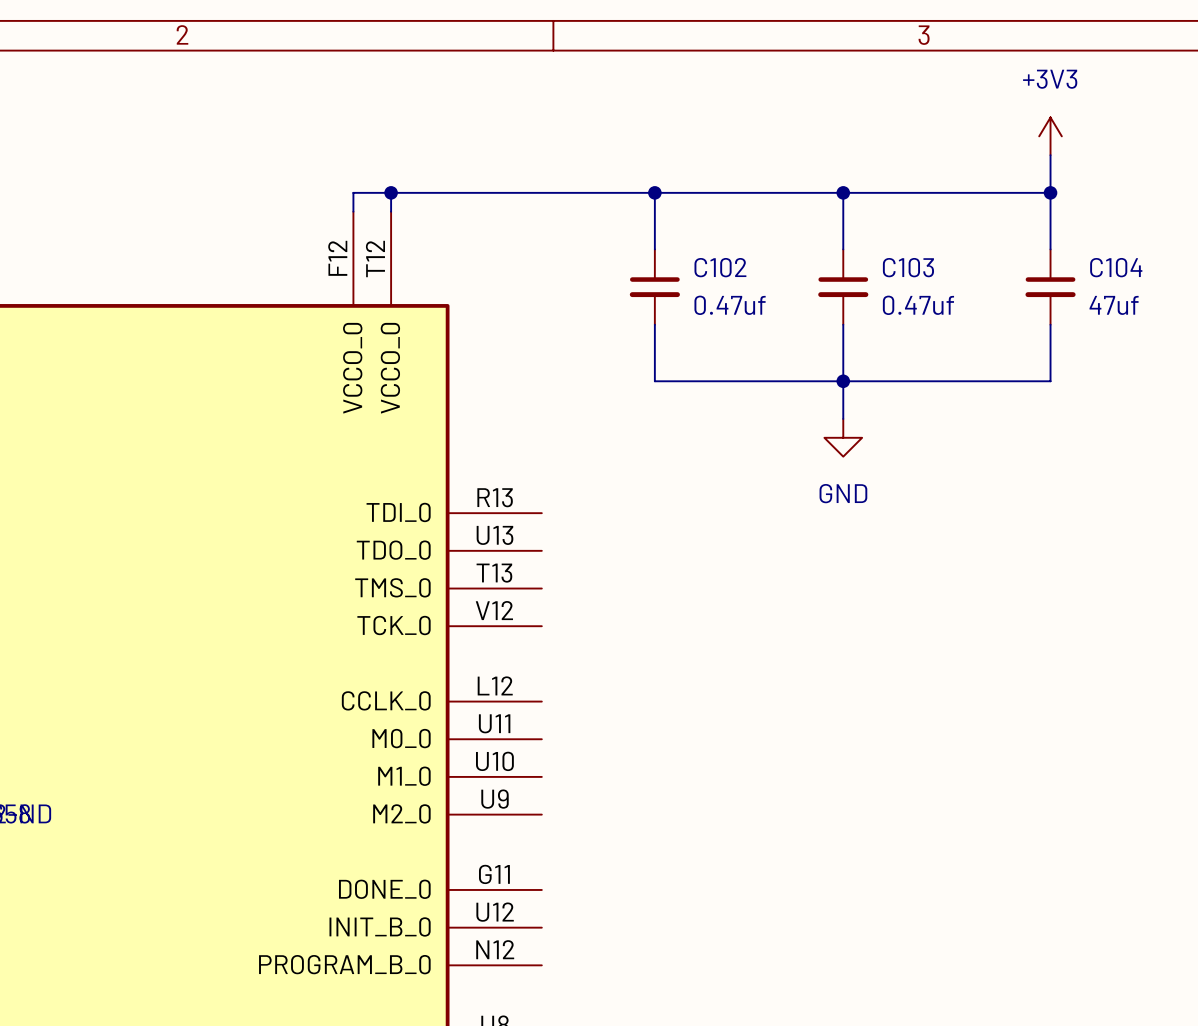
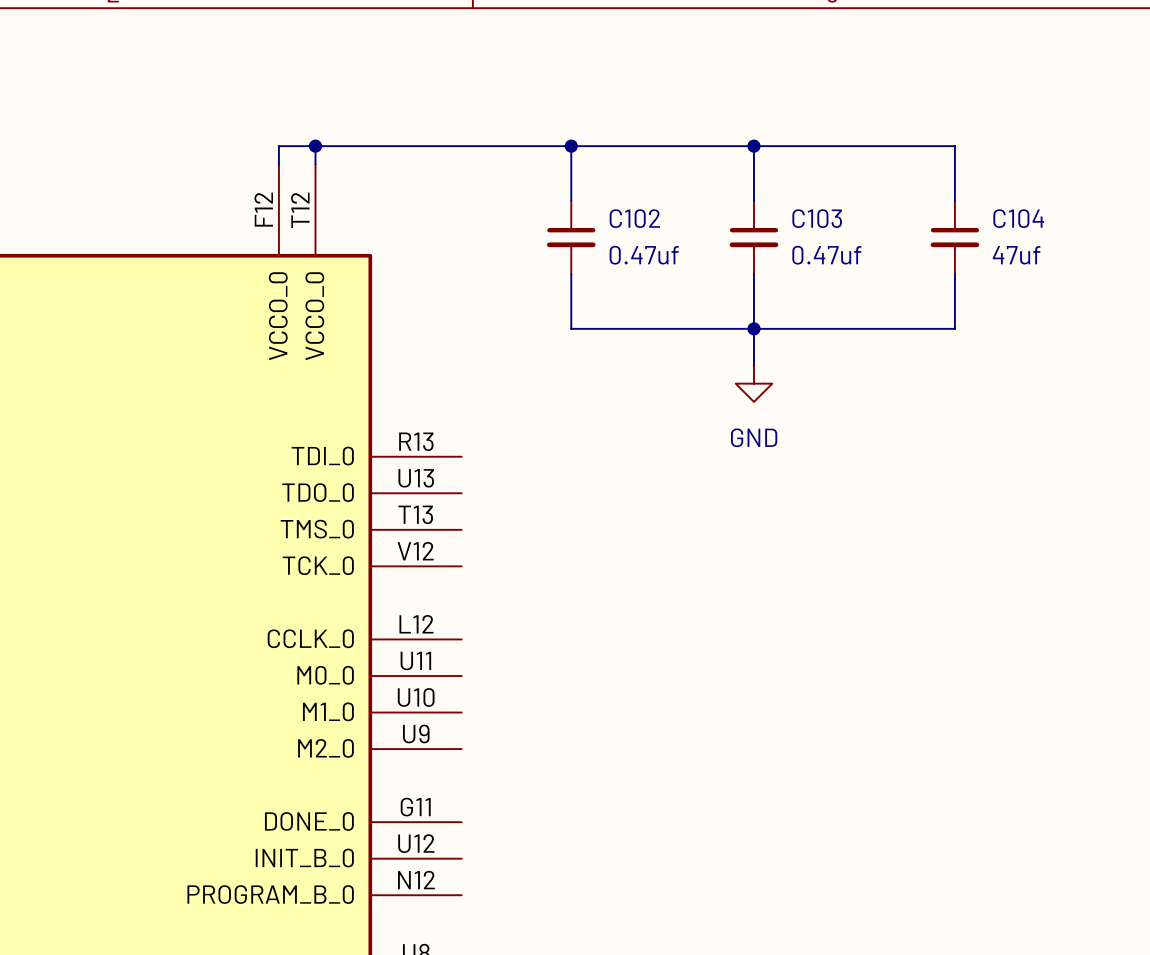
power symbol: +3V3 (1050, 136) -> none
wire: (1050, 155) (1050, 192) -> none
junction: (1050, 192) -> none

